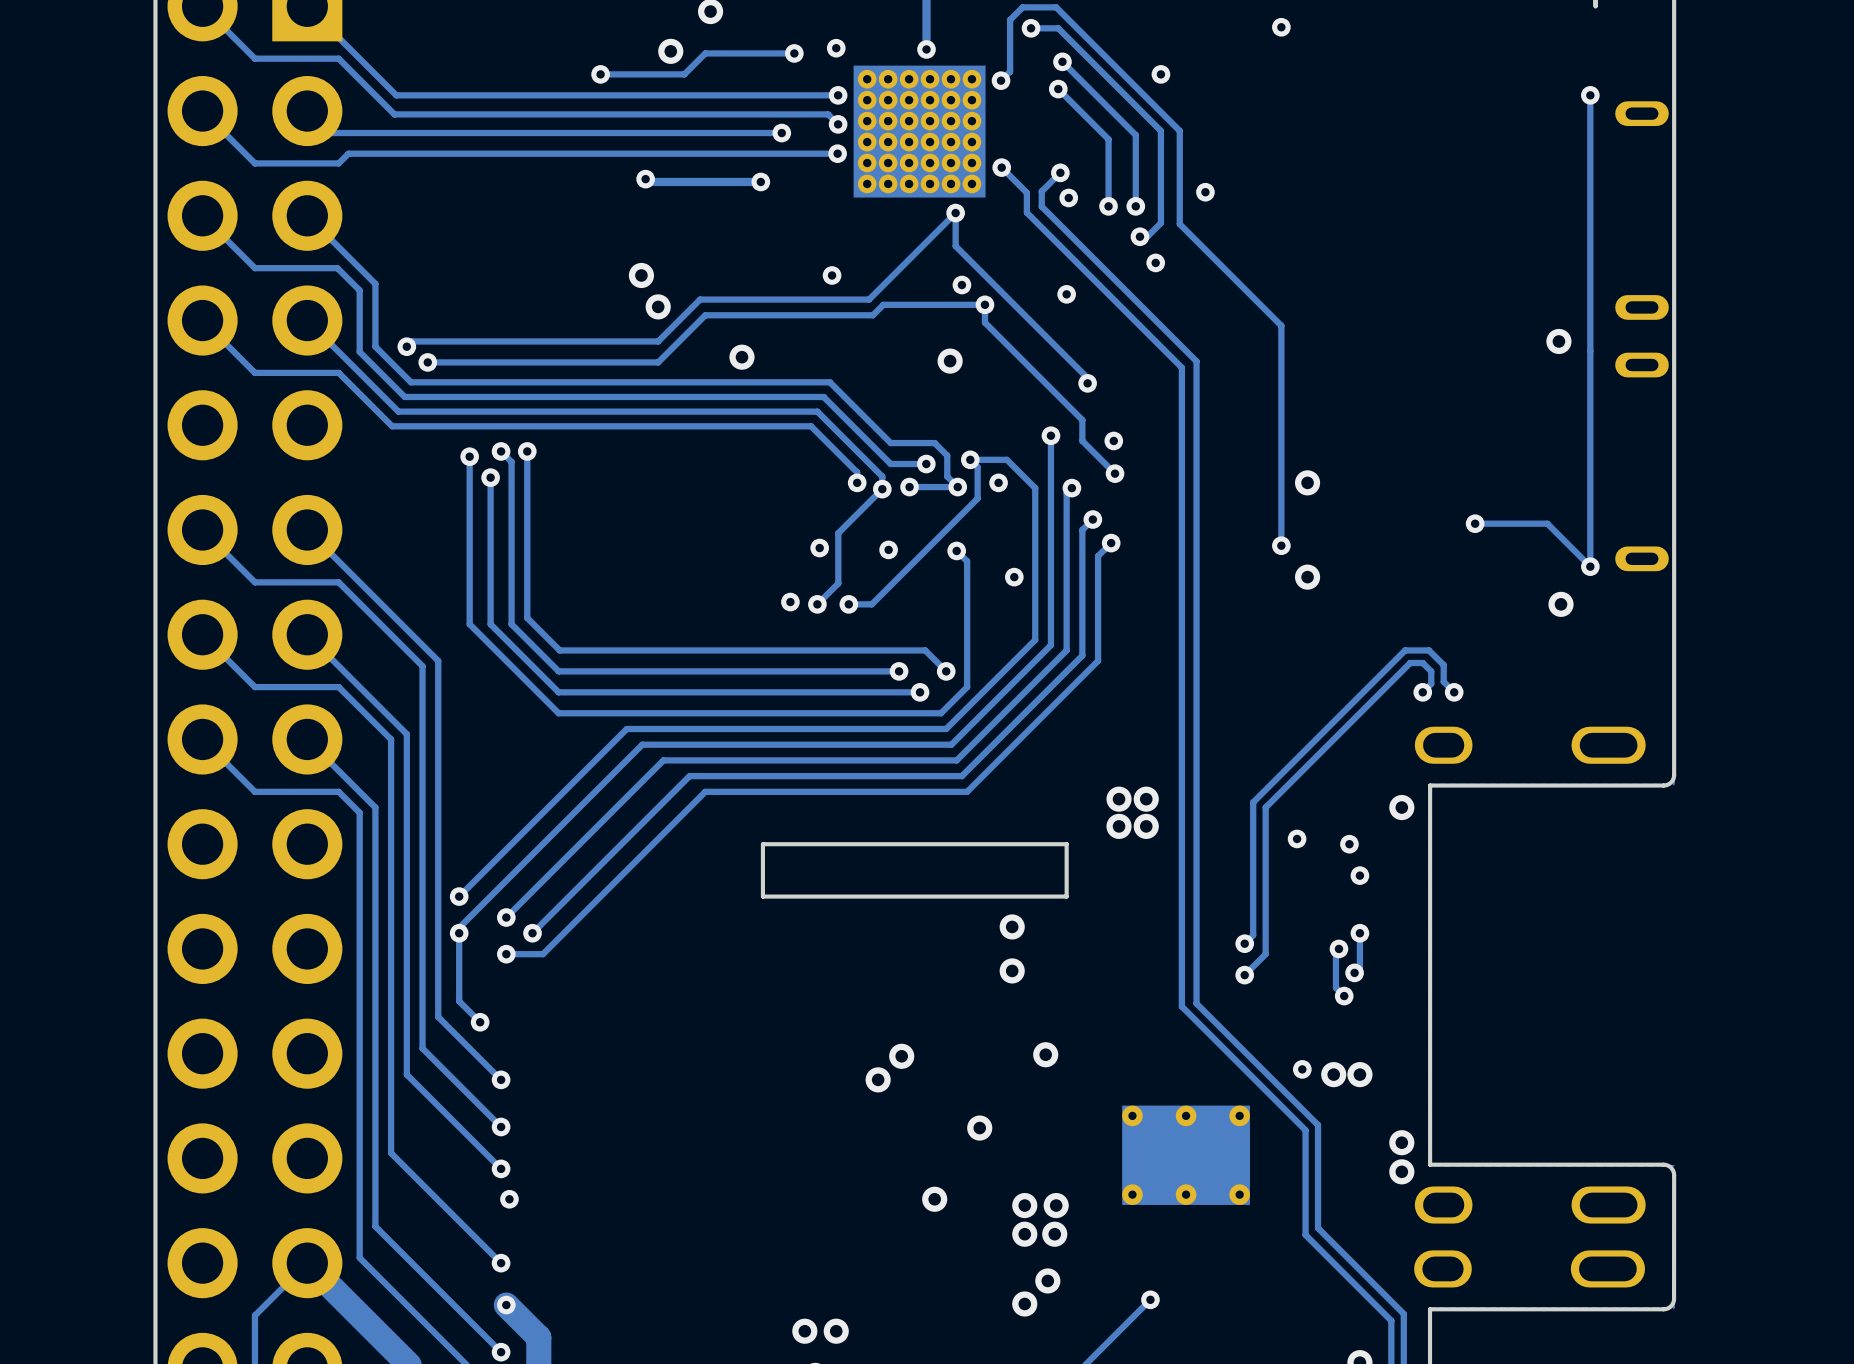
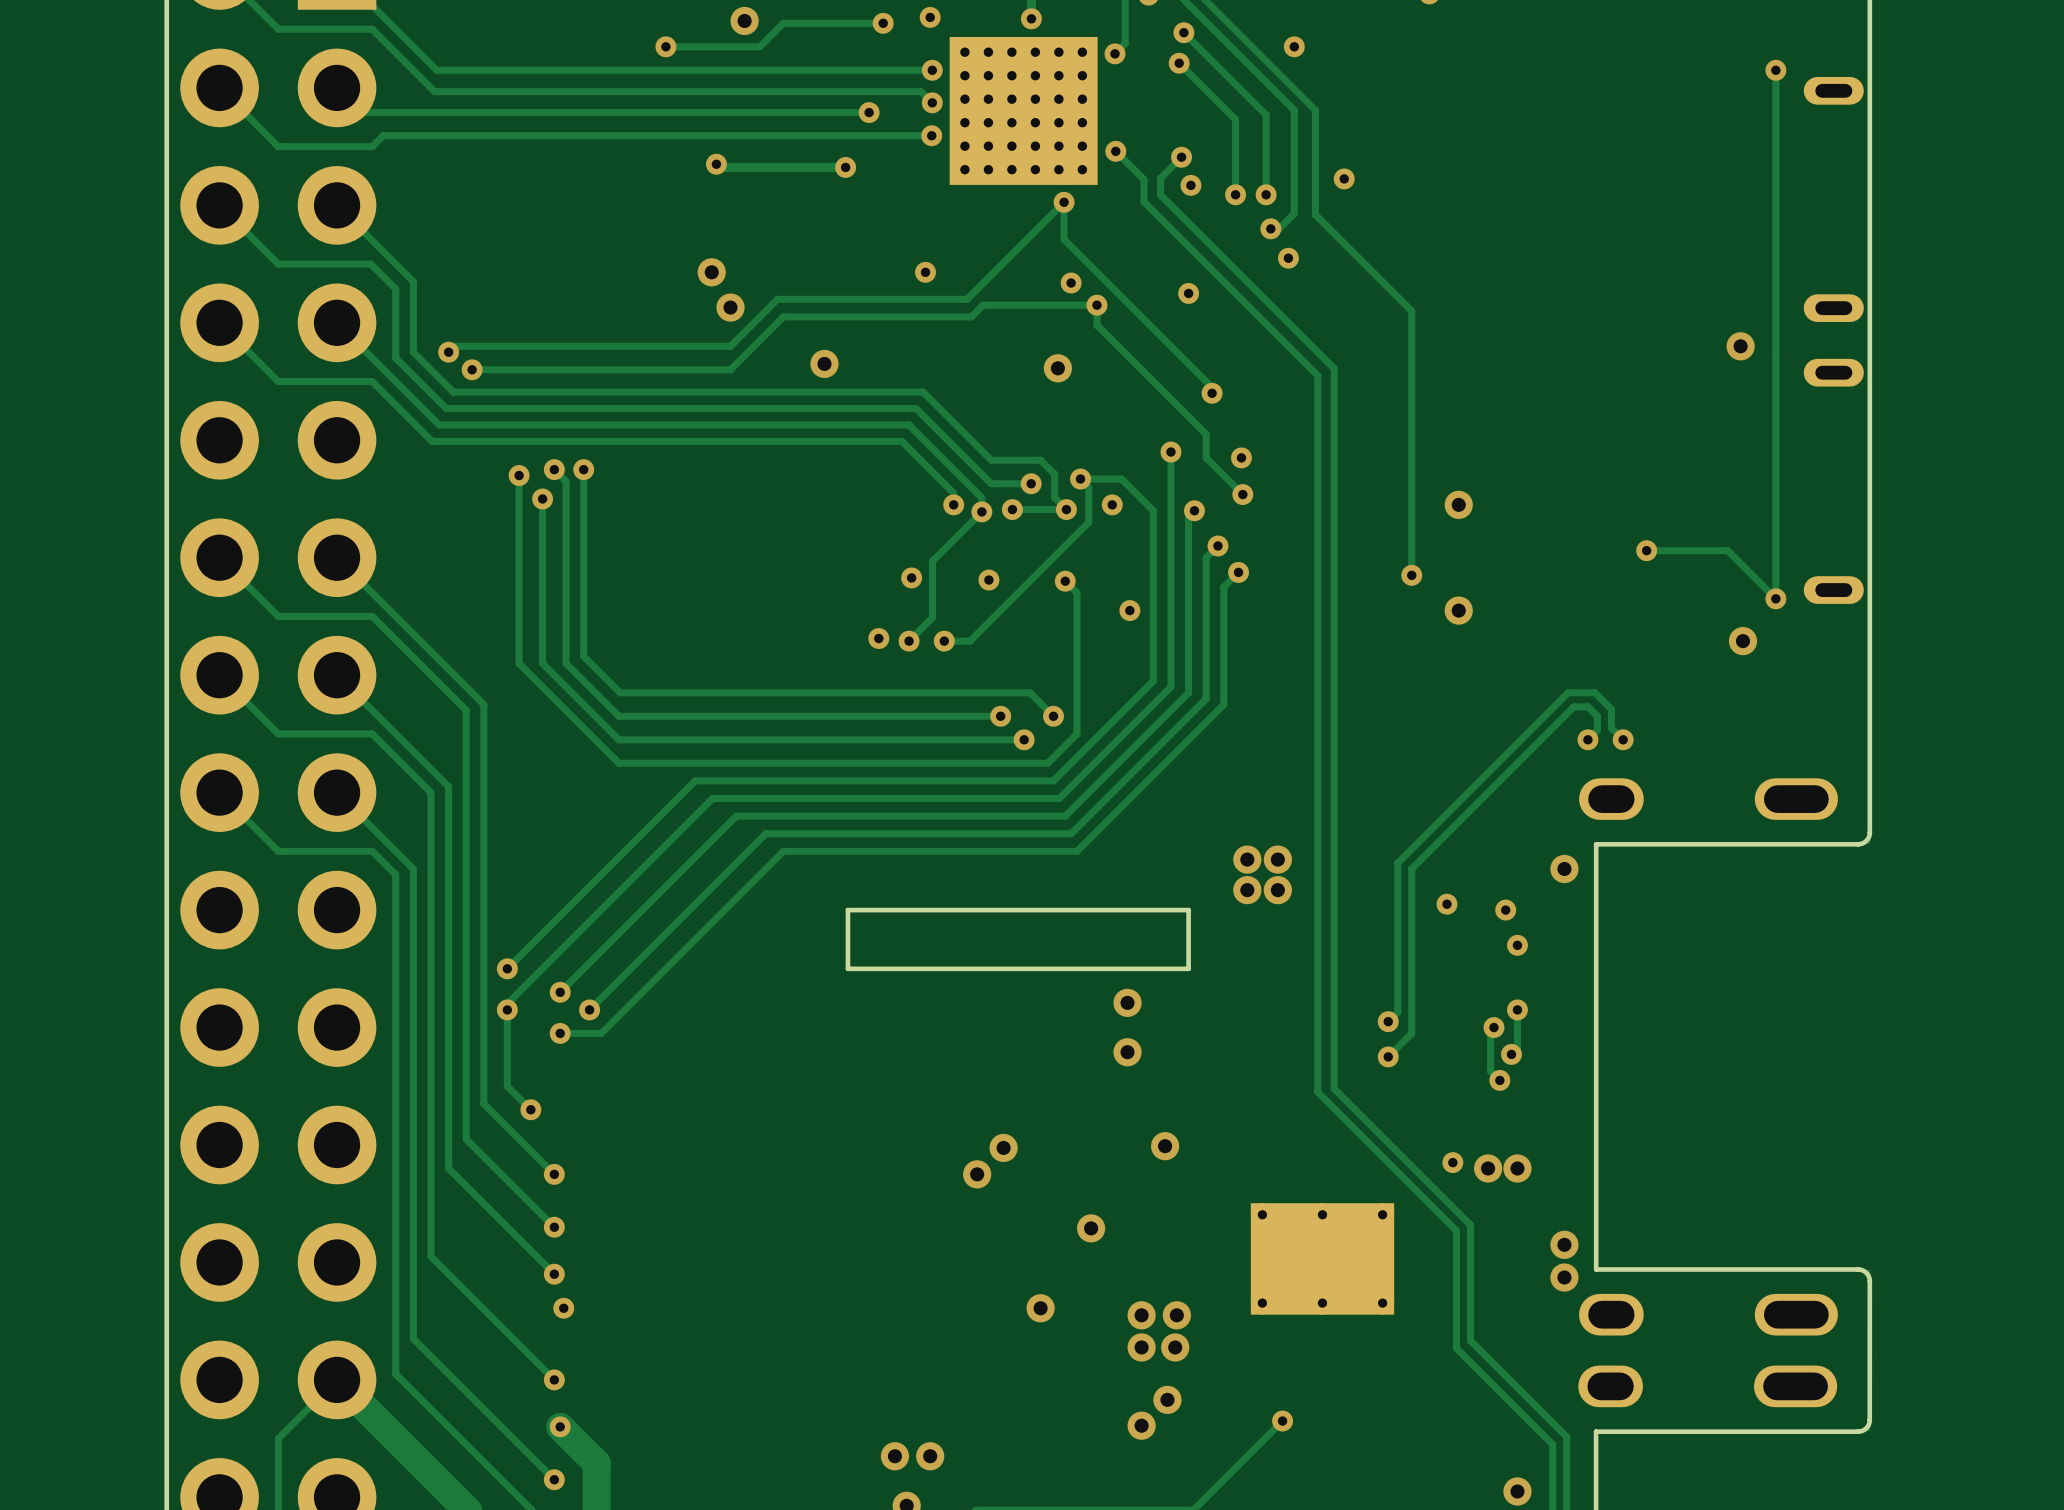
track: (1265, 310) (1281, 325) (1281, 545) -> (1411, 311) (1411, 575)
via position: (1281, 545) -> (1411, 575)

